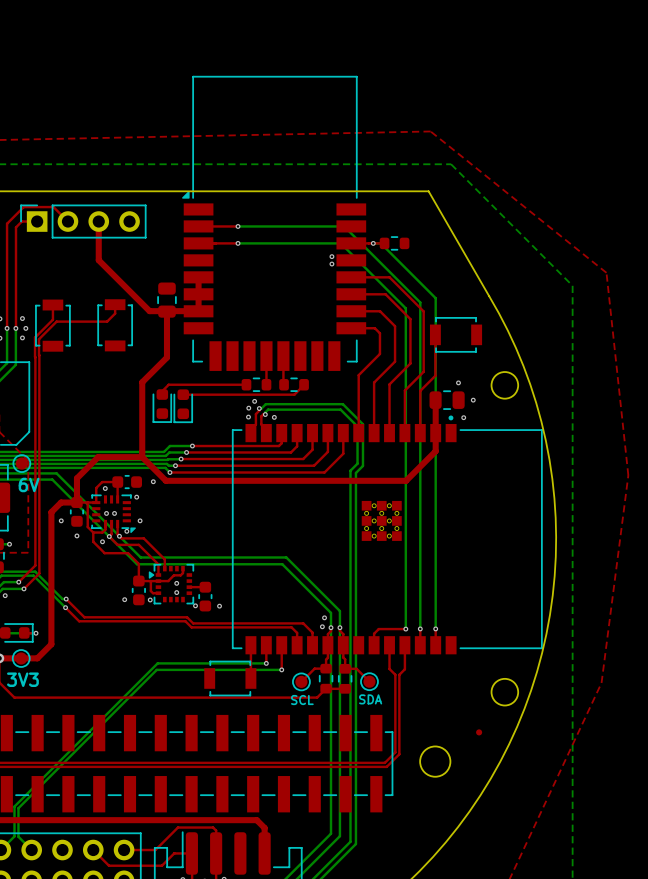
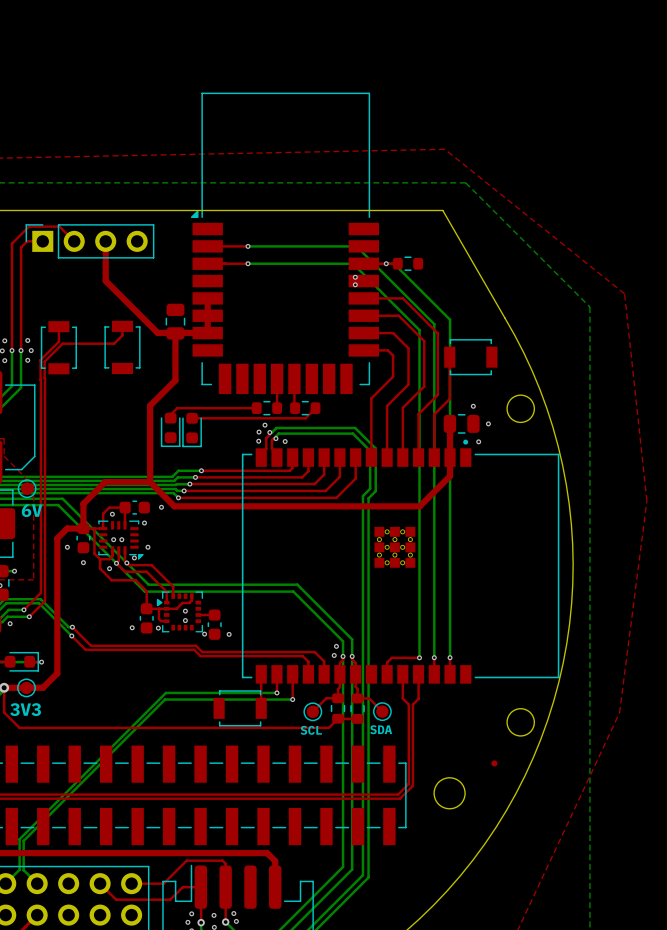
via: (331, 256) -> none
via: none -> (355, 277)
via: (331, 264) -> none
via: none -> (355, 284)

